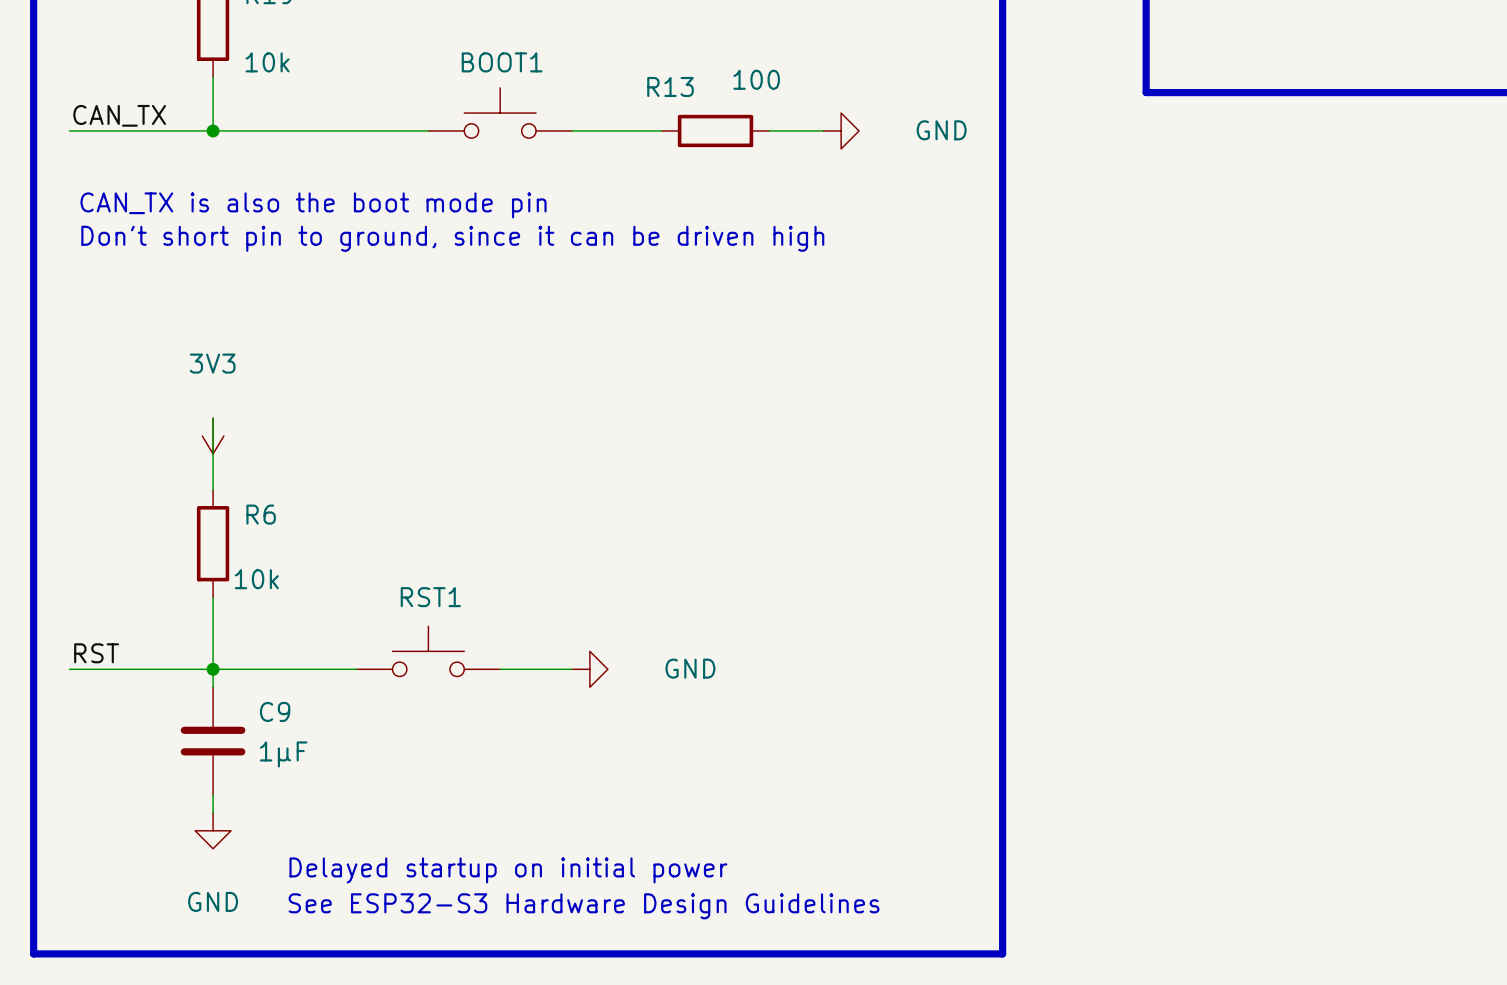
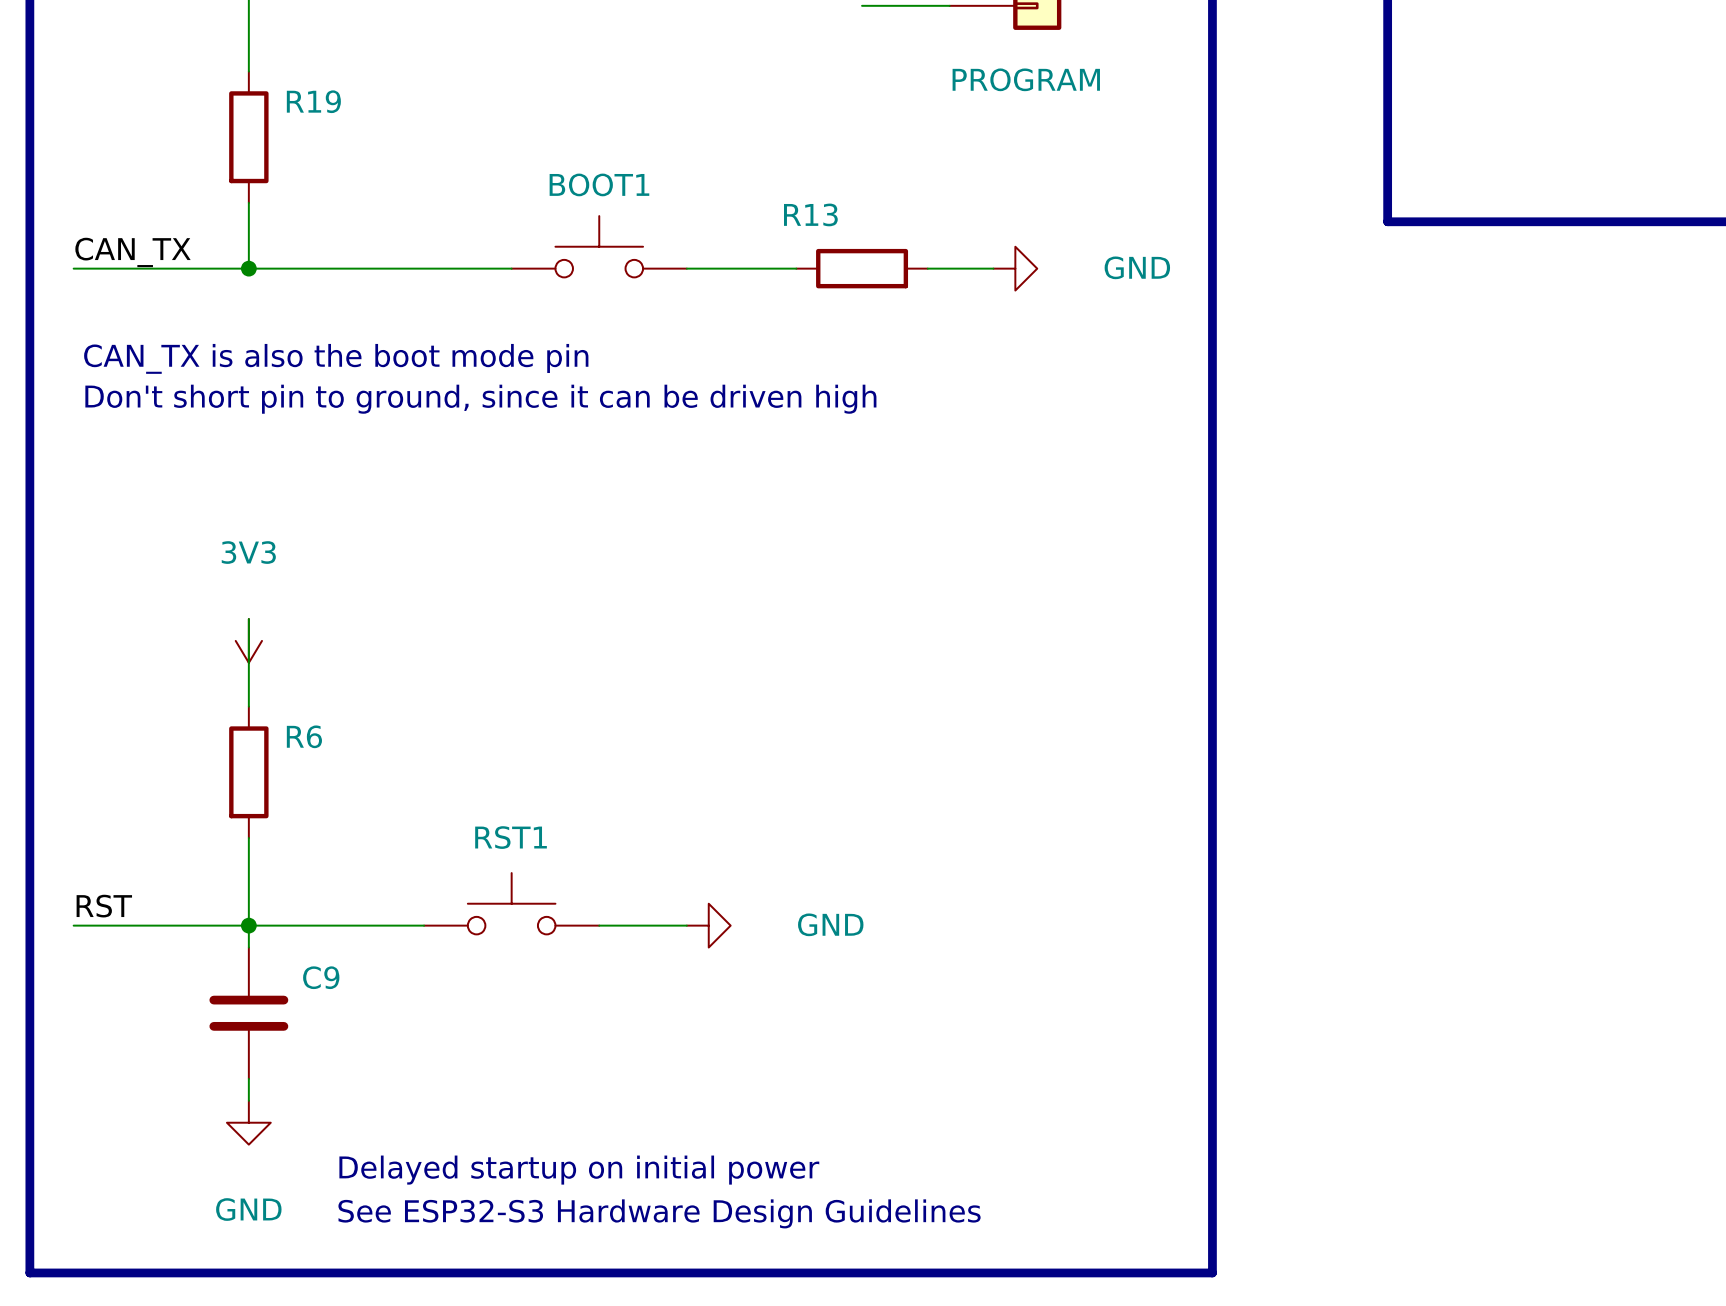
R19 text: 10k (267, 62) -> none
R13 text: 100 (756, 79) -> none
R6 text: 10k (256, 579) -> none
C9 text: 1µF (283, 754) -> none

